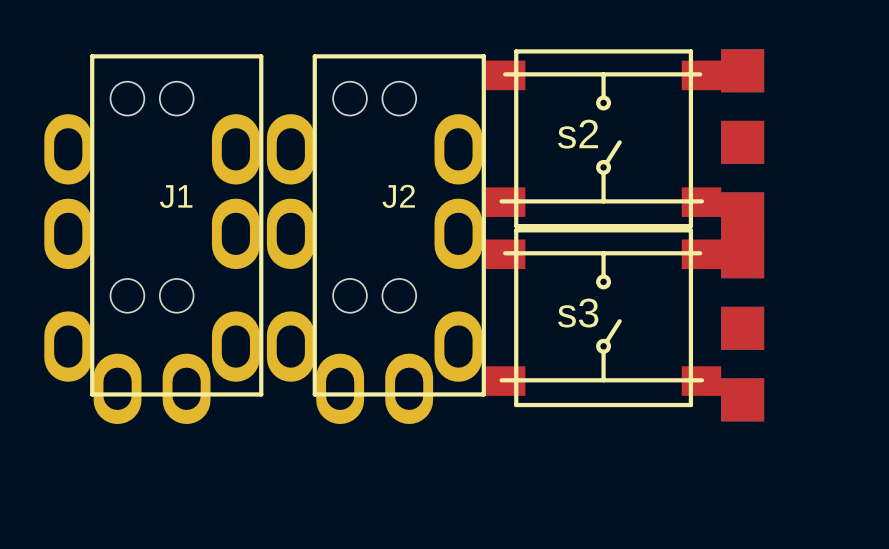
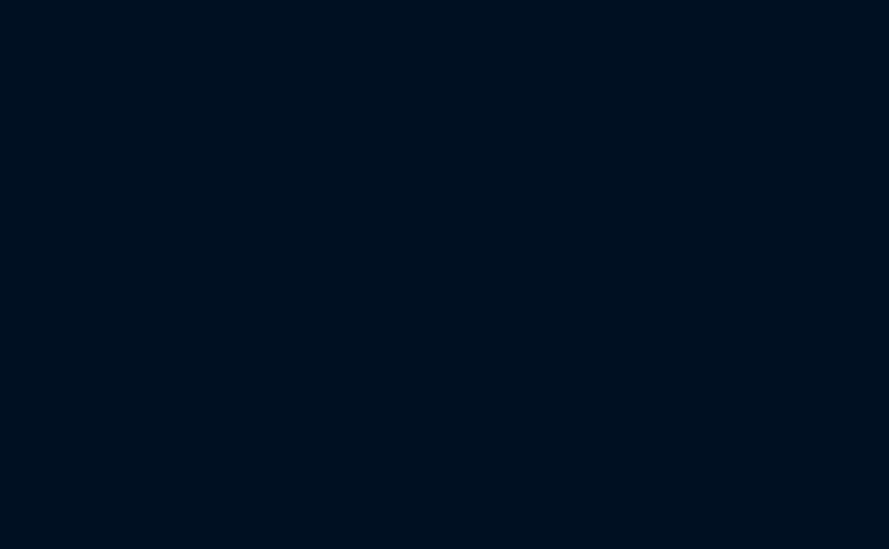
s2: (603, 138) -> none
part: (742, 142) -> none
J1: (153, 239) -> none
J2: (376, 239) -> none
s3: (603, 317) -> none
part: (742, 328) -> none

